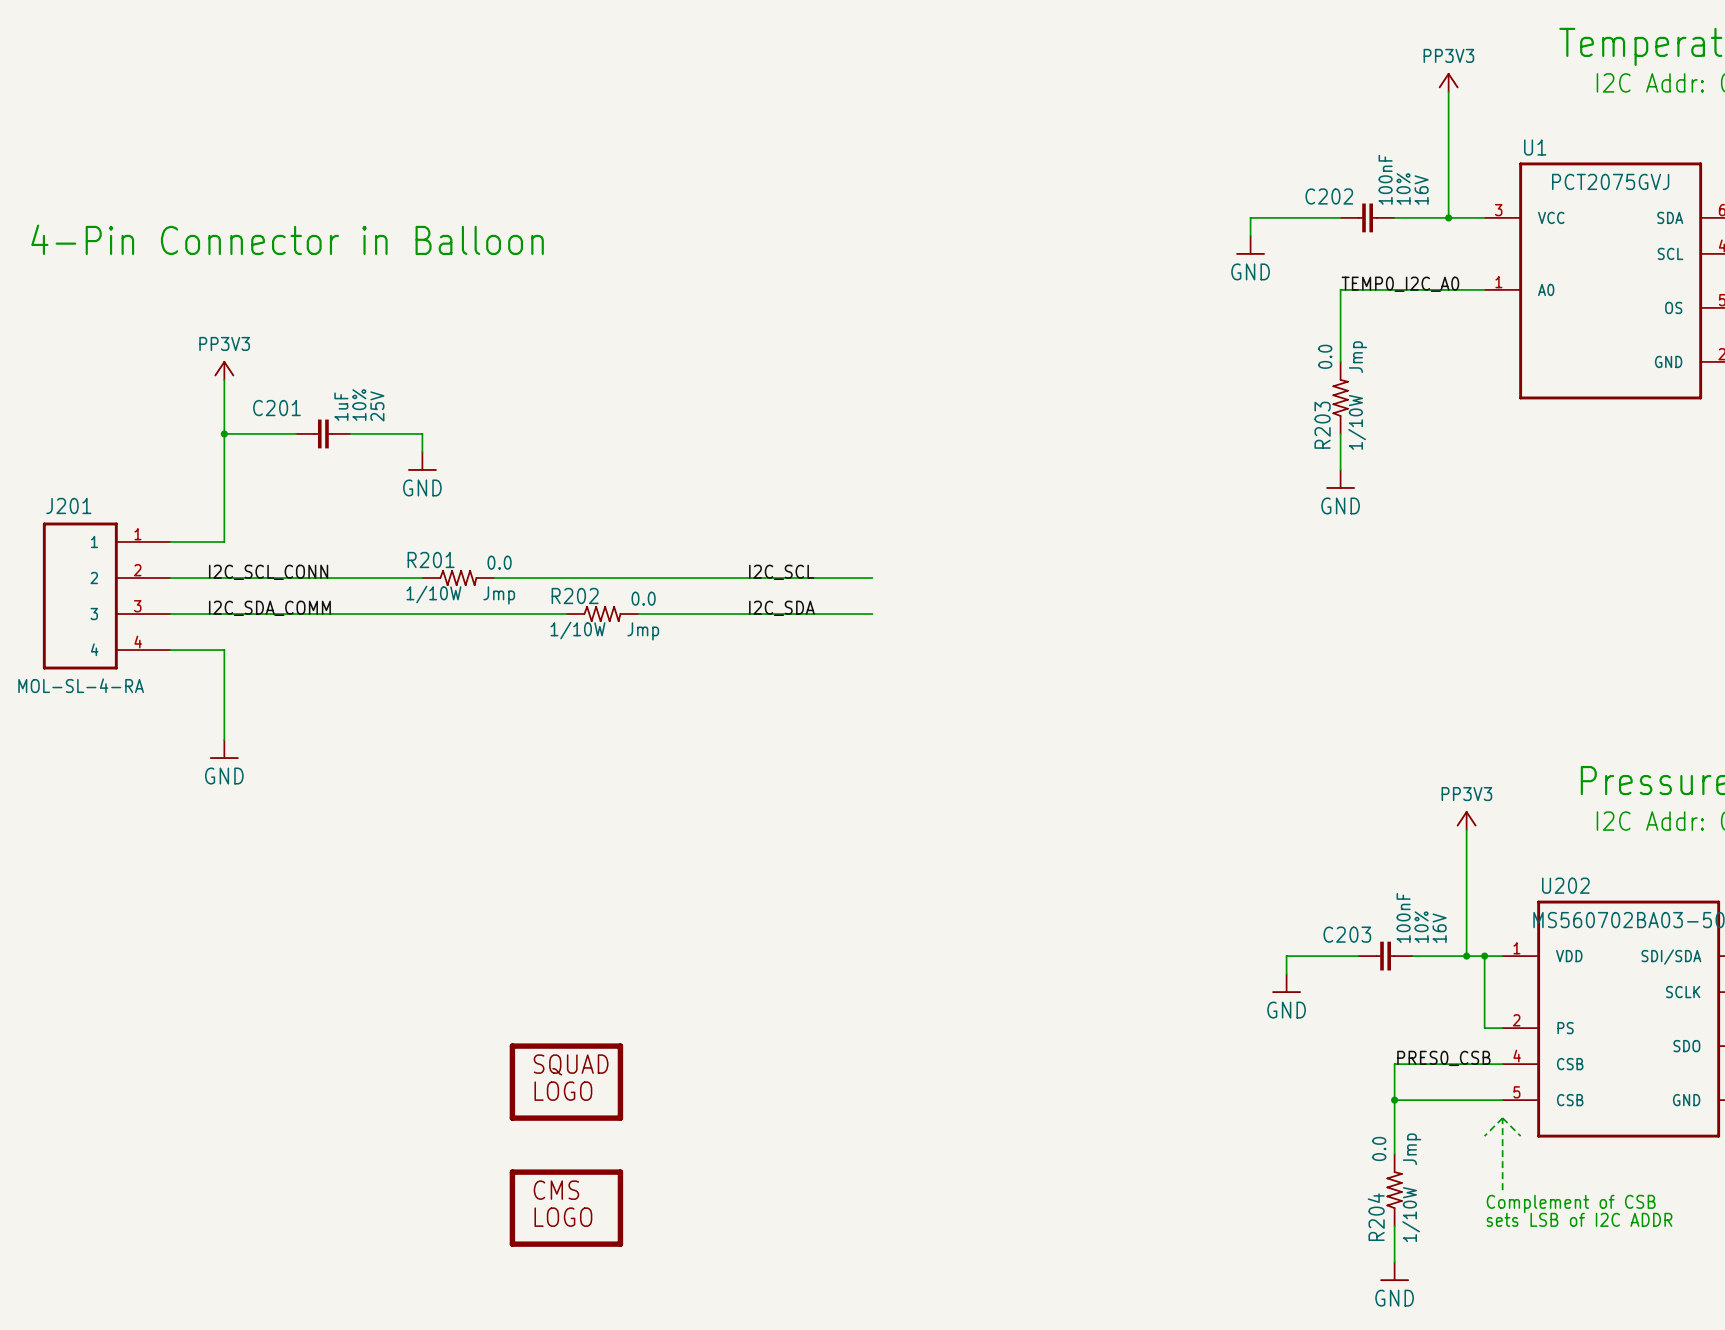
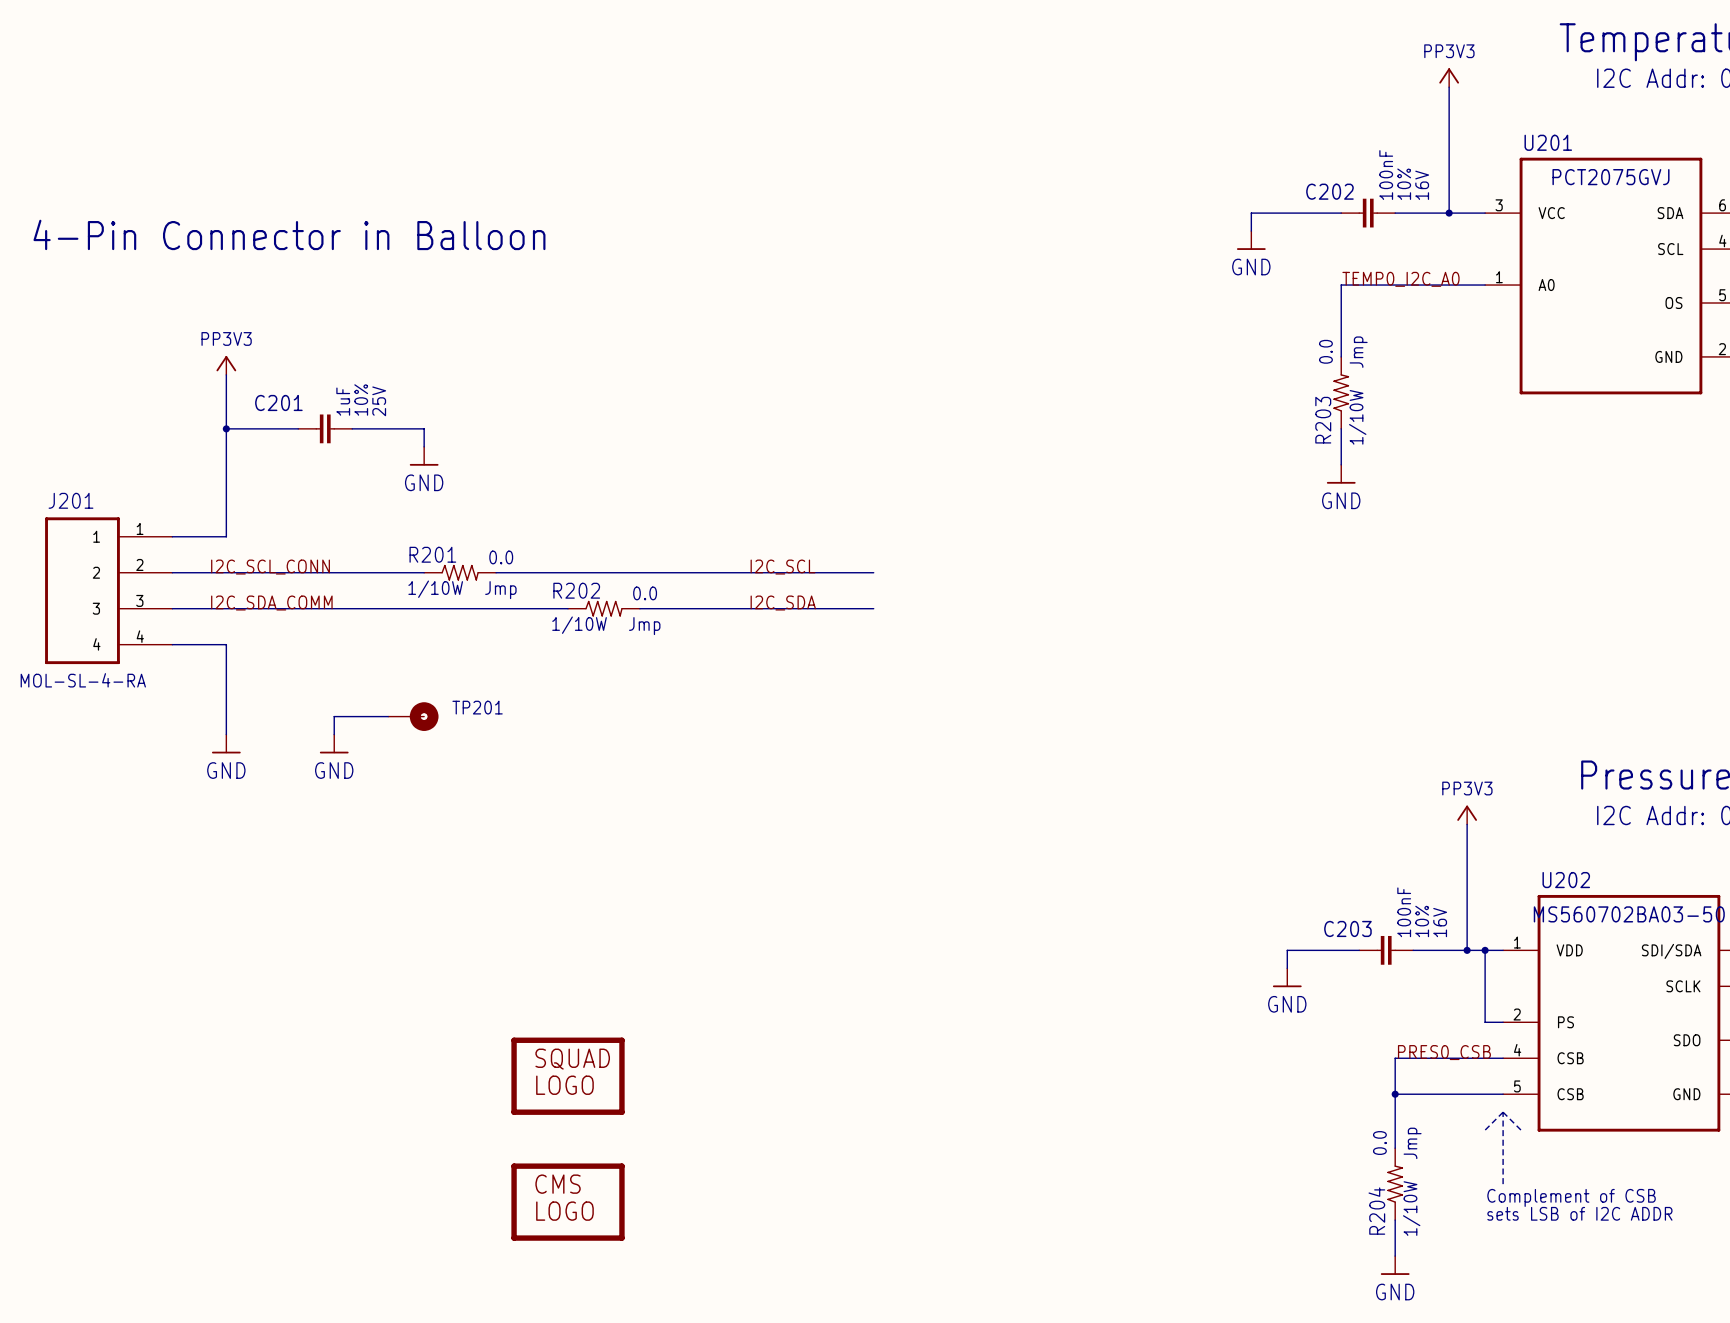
U1 name: U1 (1535, 147) -> U201 (1548, 142)
wire: none -> (388, 716) (334, 716) (334, 734)
TP201: none -> (413, 716)
power symbol: none -> GND (334, 744)

